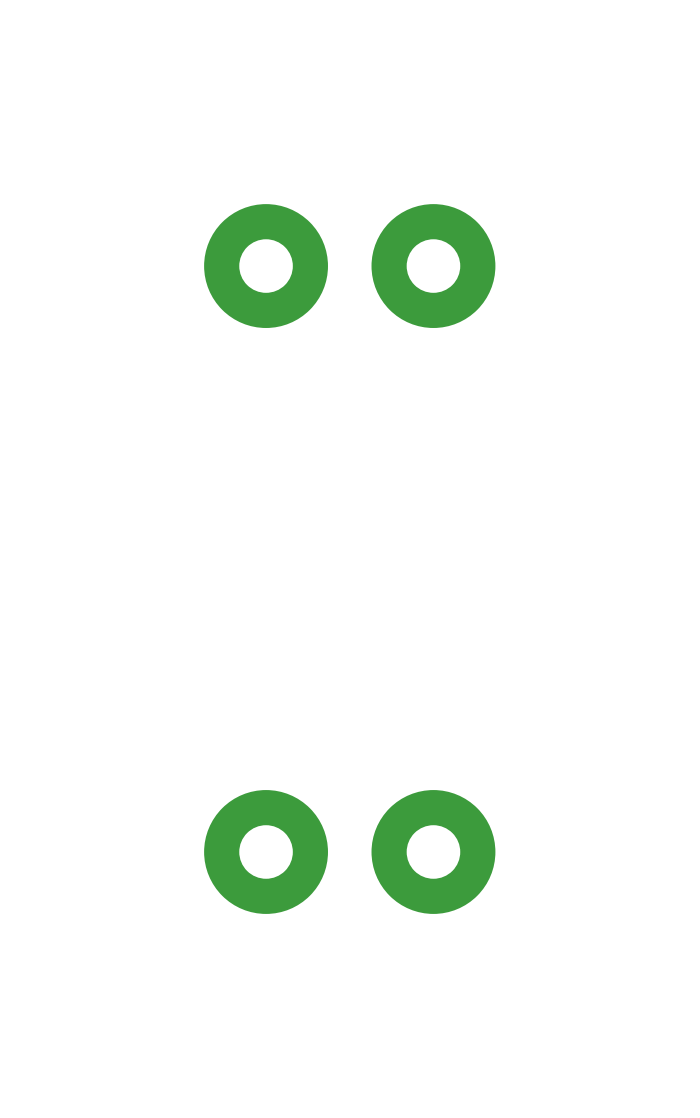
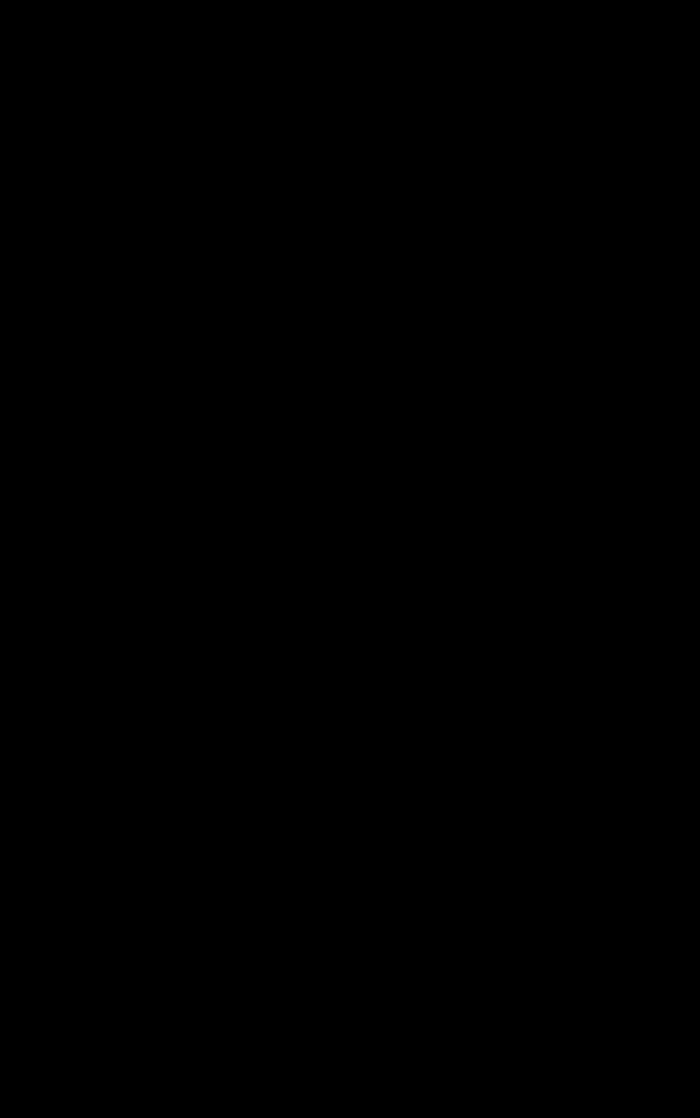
part: (349, 266) -> none
part: (349, 851) -> none

